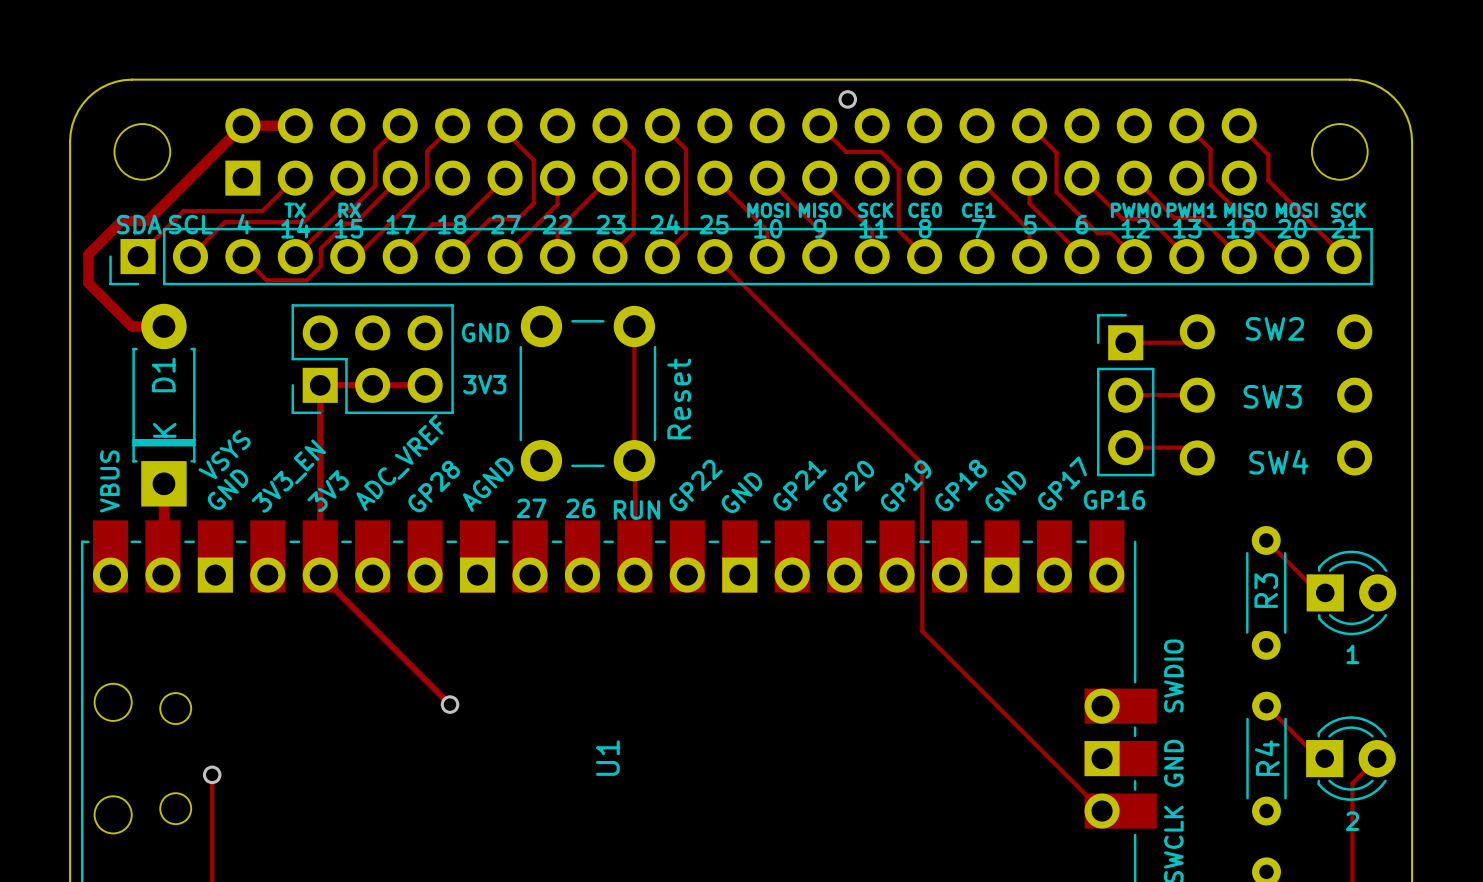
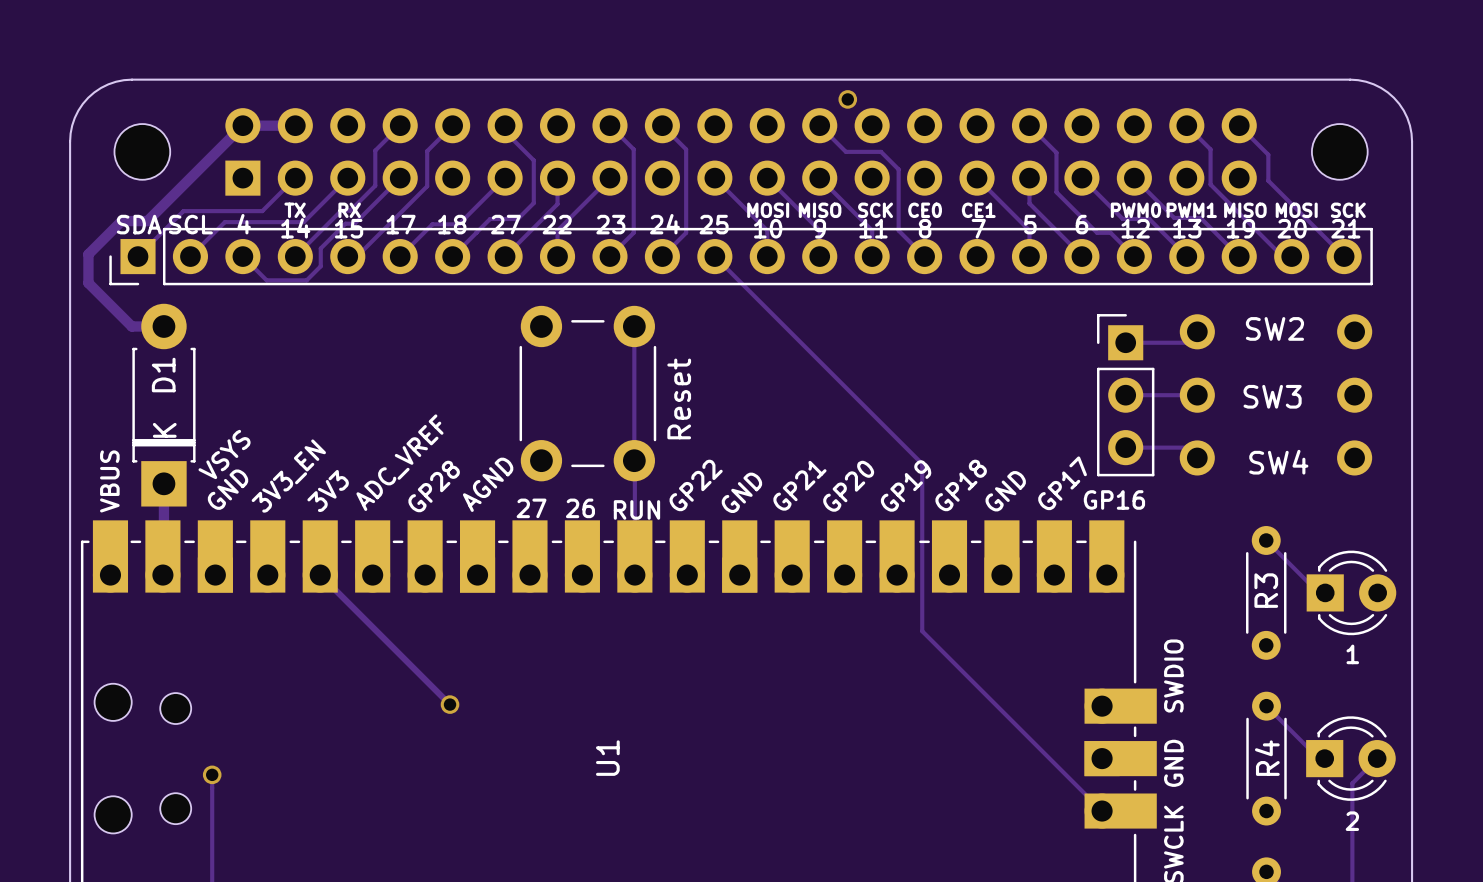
text: GND (485, 332) -> none
part: (372, 359) -> none
text: 3V3 (484, 384) -> none
track: (425, 385) (320, 385) (320, 575) -> none

